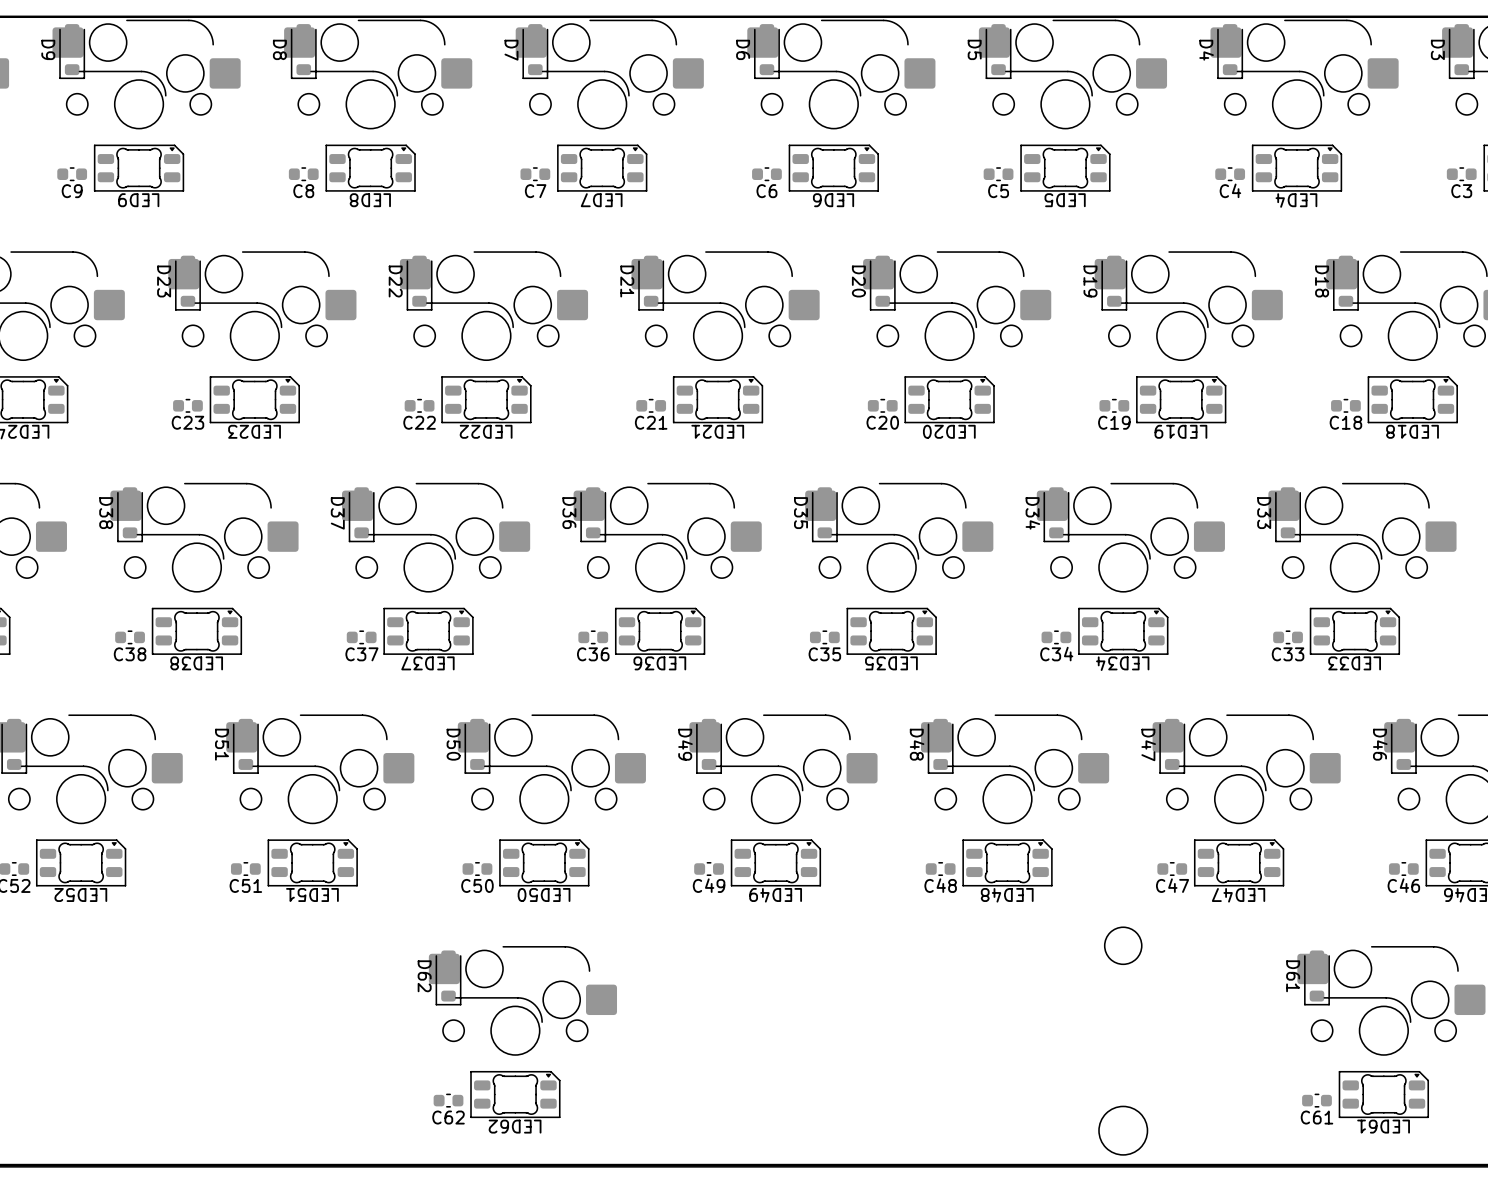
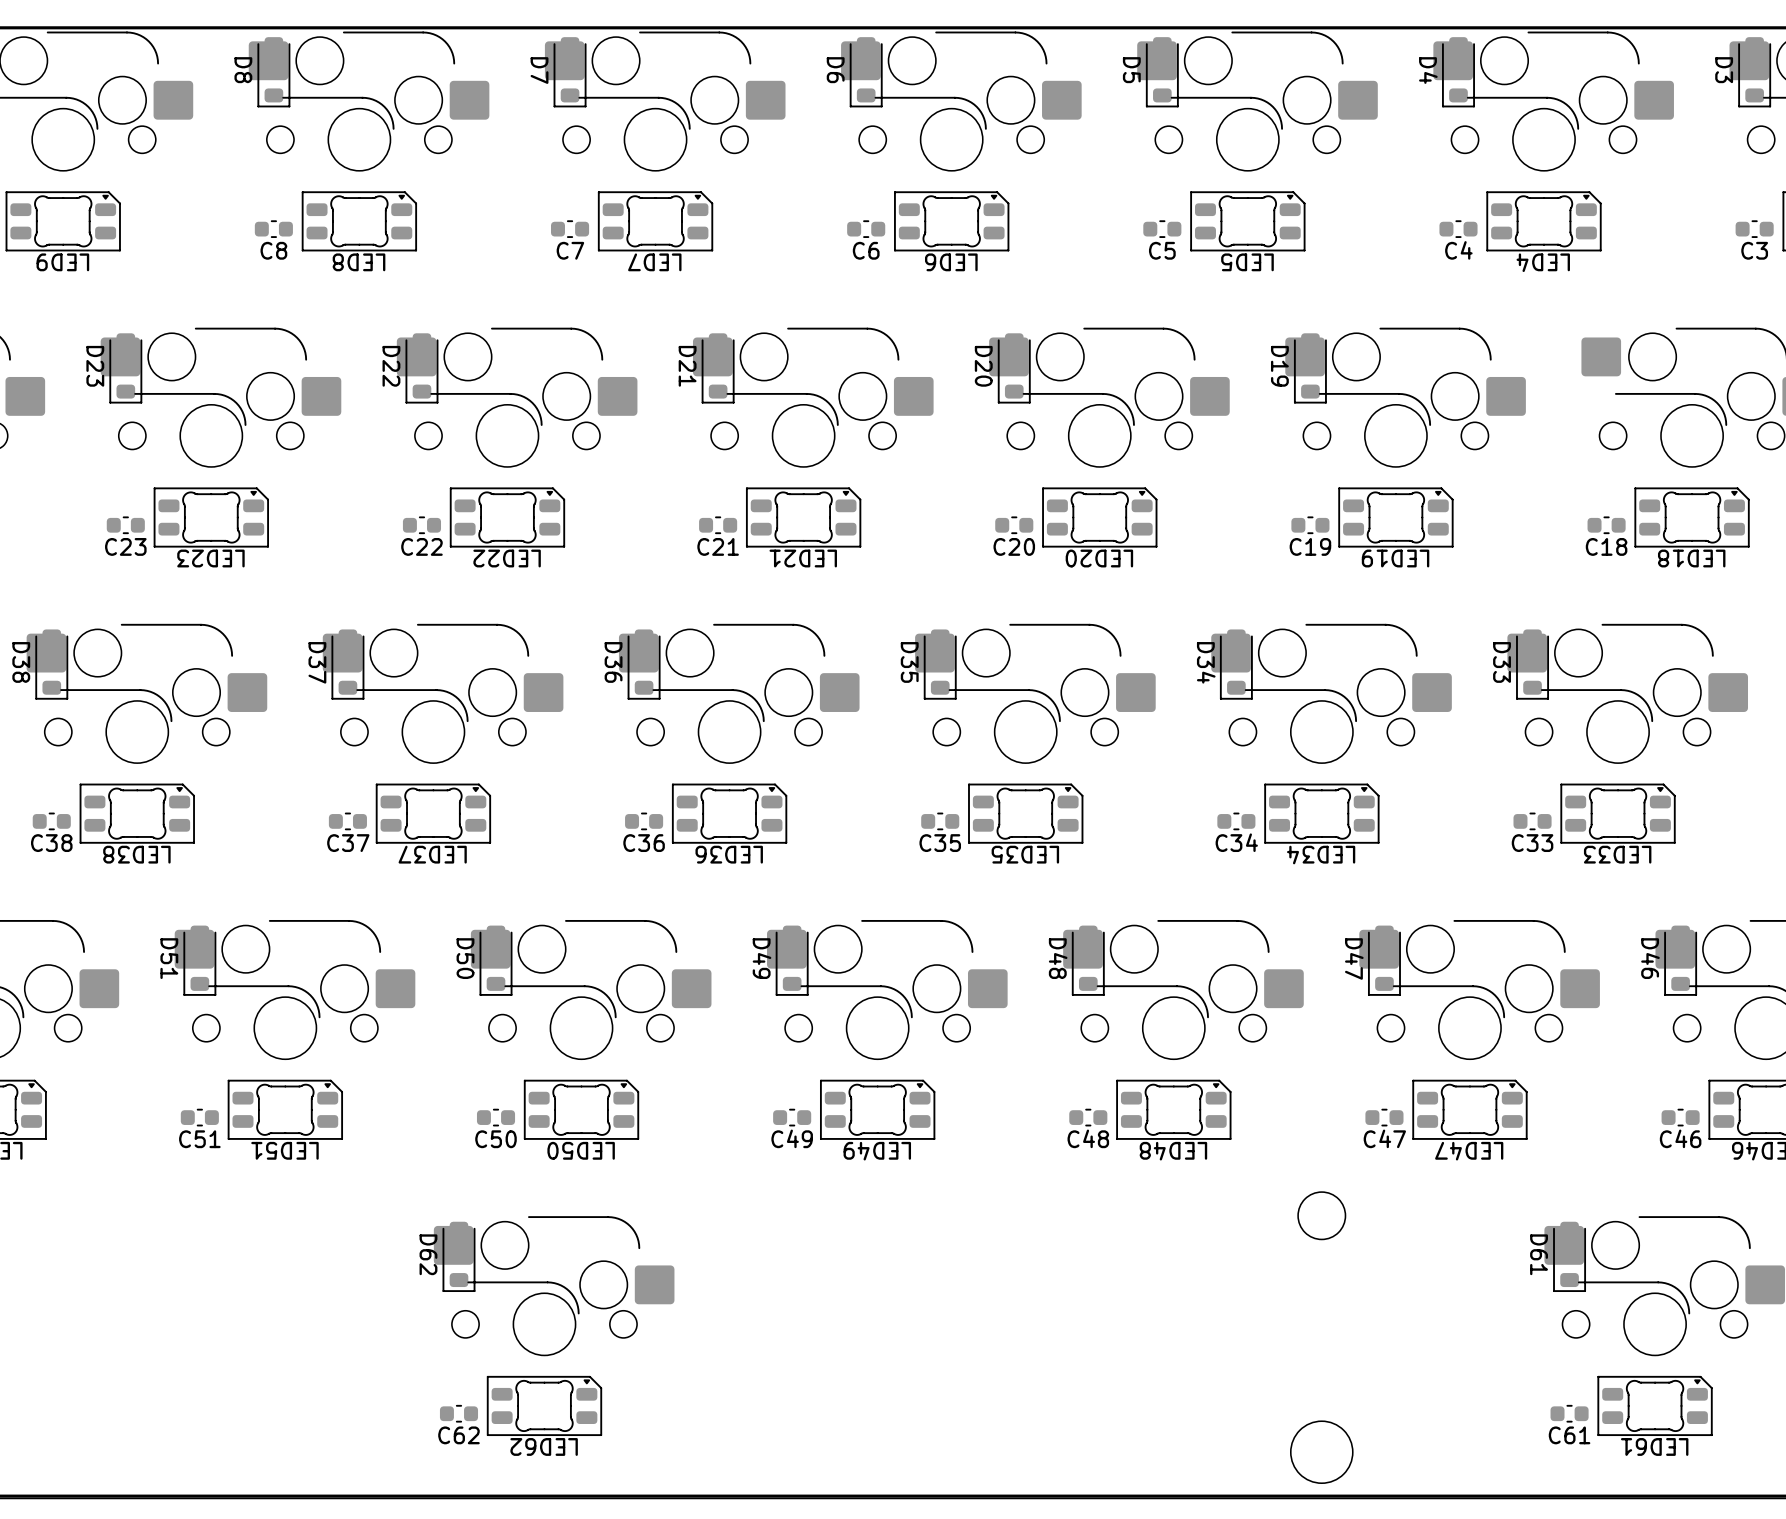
D18: (1345, 283) -> none

